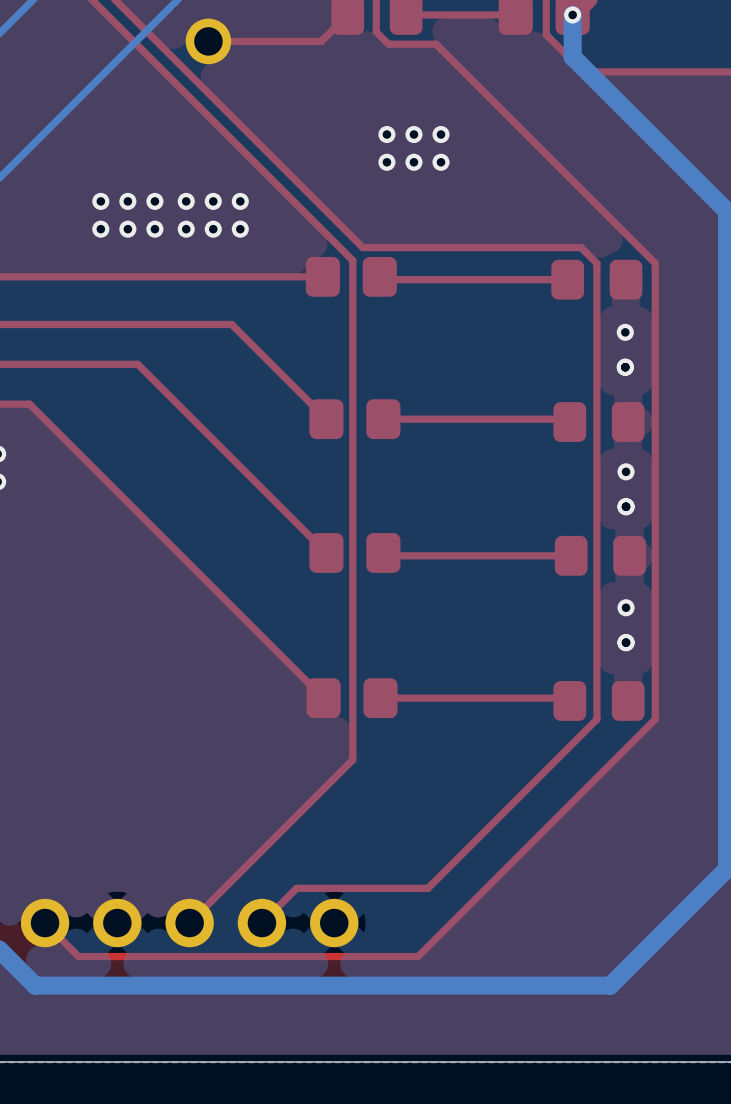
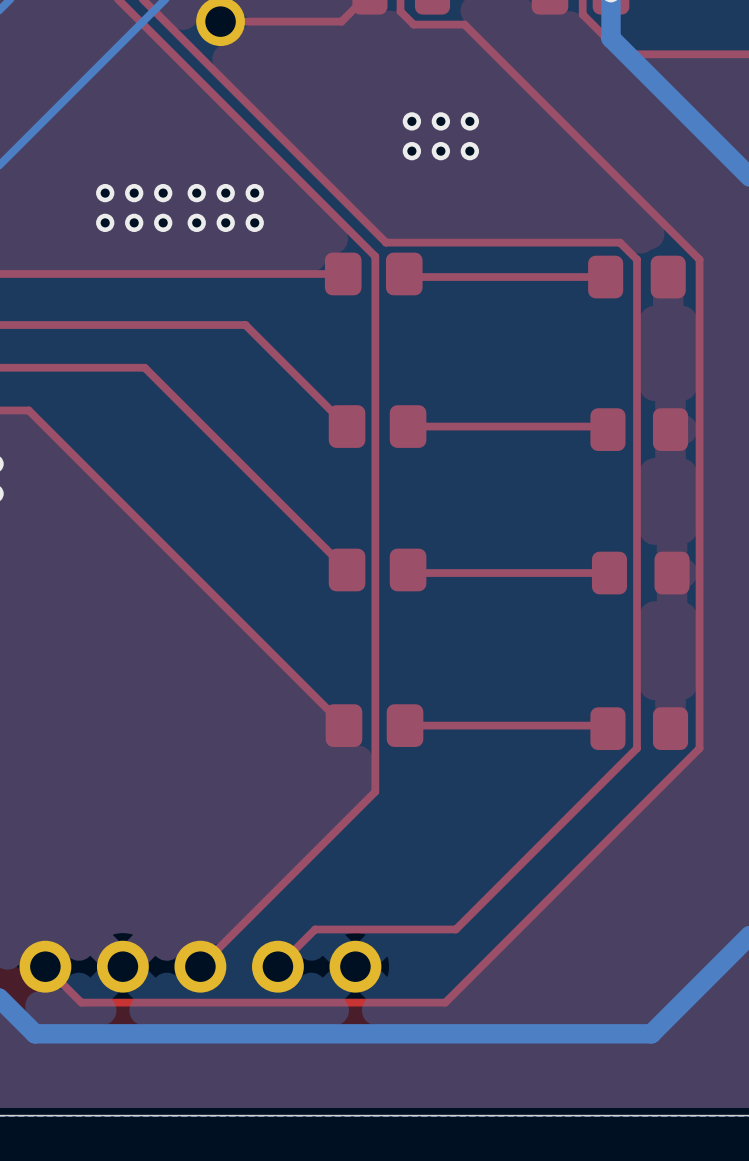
via: (625, 332) -> none
via: (625, 367) -> none
via: (626, 471) -> none
via: (626, 506) -> none
via: (626, 607) -> none
via: (626, 642) -> none

